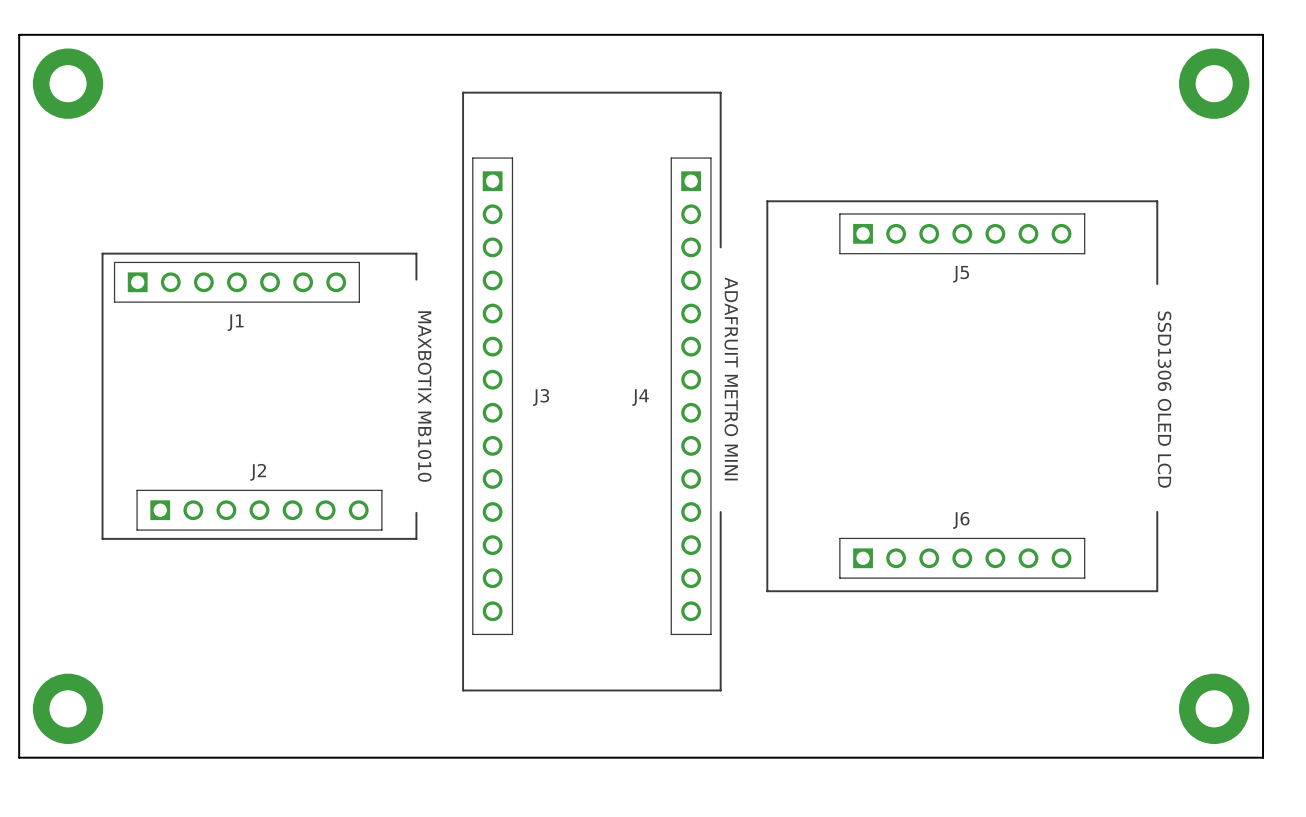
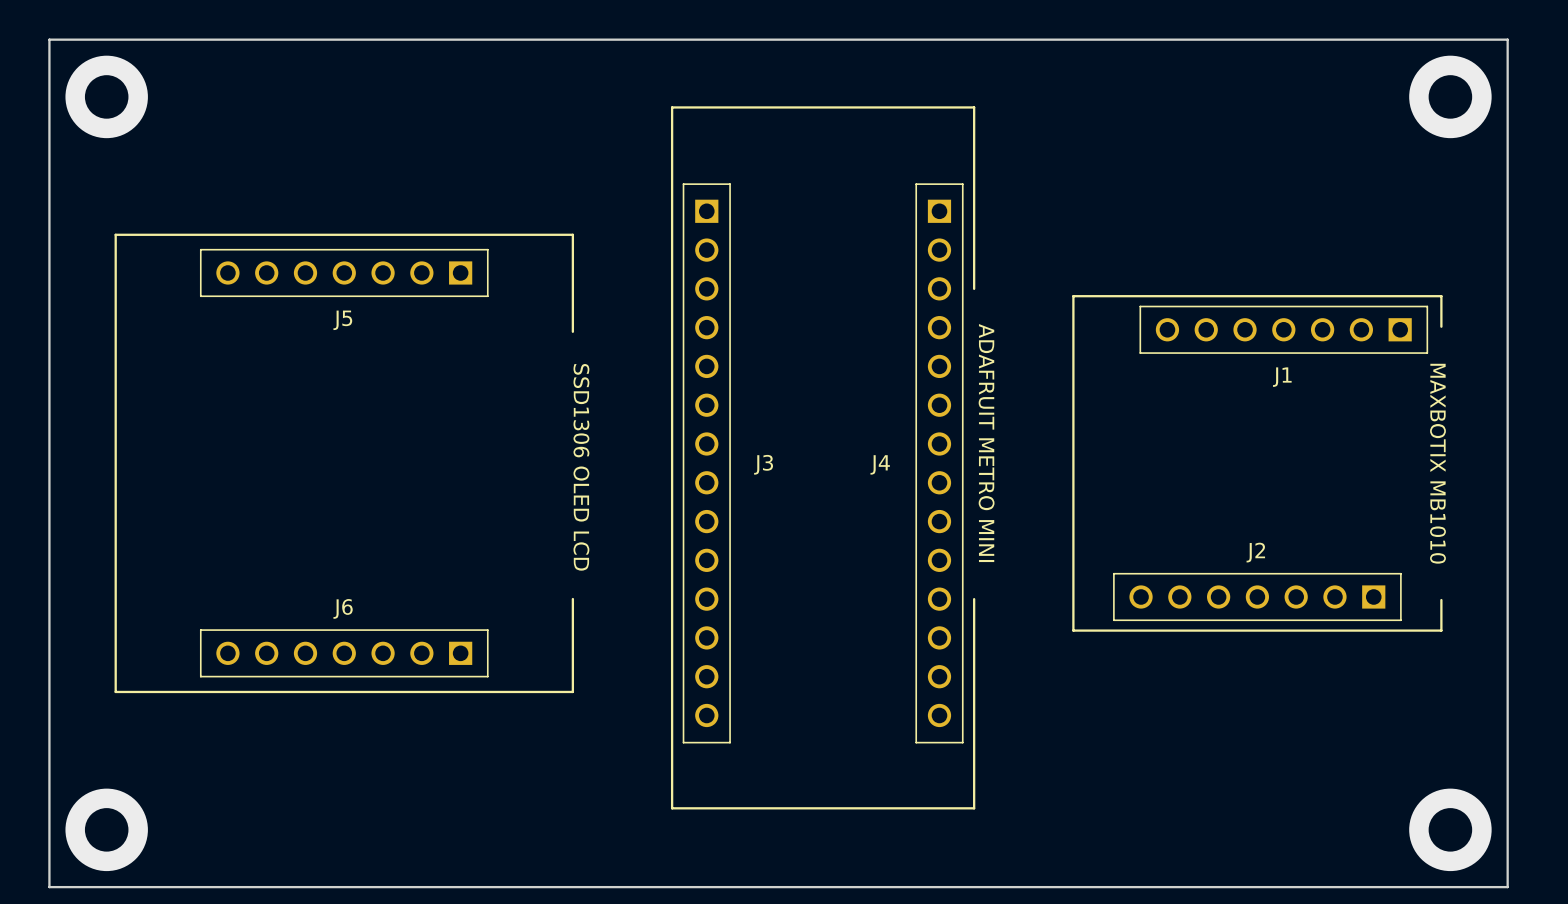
line: (550, 92) (463, 92) (463, 690) (550, 690) -> (672, 107) (672, 808)
line: (720, 92) (720, 247) -> (871, 107) (974, 107) (974, 288)
J5 rotation: 0° (962, 233) -> 180° (344, 272)
J5 position: (962, 233) -> (344, 272)
line: (416, 279) (416, 253) (102, 253) (102, 538) (416, 538) (416, 512) -> none
line: none -> (1441, 326) (1441, 296) (1073, 296) (1073, 630) (1441, 630) (1441, 600)
J1 rotation: 0° (236, 282) -> 180° (1283, 329)
J1 position: (236, 282) -> (1283, 329)
line: none -> (572, 331) (572, 234) (115, 234) (115, 691) (572, 691) (572, 599)
line: (1157, 284) (1157, 201) (767, 201) (767, 591) (1157, 591) (1157, 511) -> none
text position: ADAFRUIT METRO MINI (731, 378) -> ADAFRUIT METRO MINI (986, 443)
text: MAXBOTIX MB1010 (424, 396) -> none
J3 position: (492, 396) -> (706, 463)
J4 position: (691, 396) -> (939, 463)
text: none -> MAXBOTIX MB1010 (1437, 463)
text: none -> SSD1306 OLED LCD (581, 467)
text: SSD1306 OLED LCD (1164, 399) -> none
J2 rotation: 0° (259, 510) -> 180° (1257, 596)
J2 position: (259, 510) -> (1257, 596)
line: (720, 512) (720, 690) -> (974, 599) (974, 808) (871, 808)
J6 rotation: 0° (962, 558) -> 180° (344, 653)
J6 position: (962, 558) -> (344, 653)

